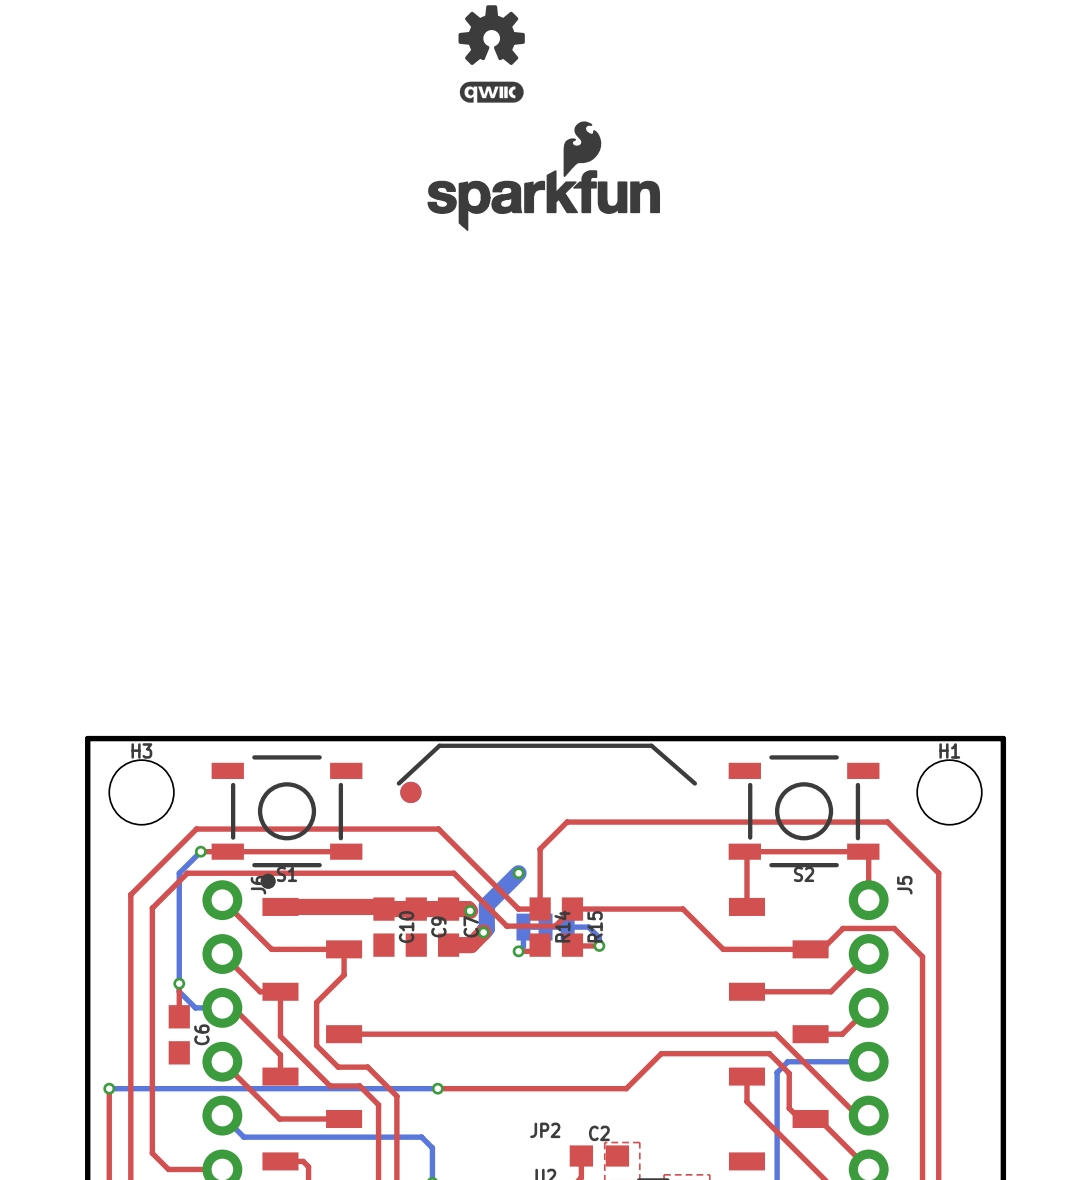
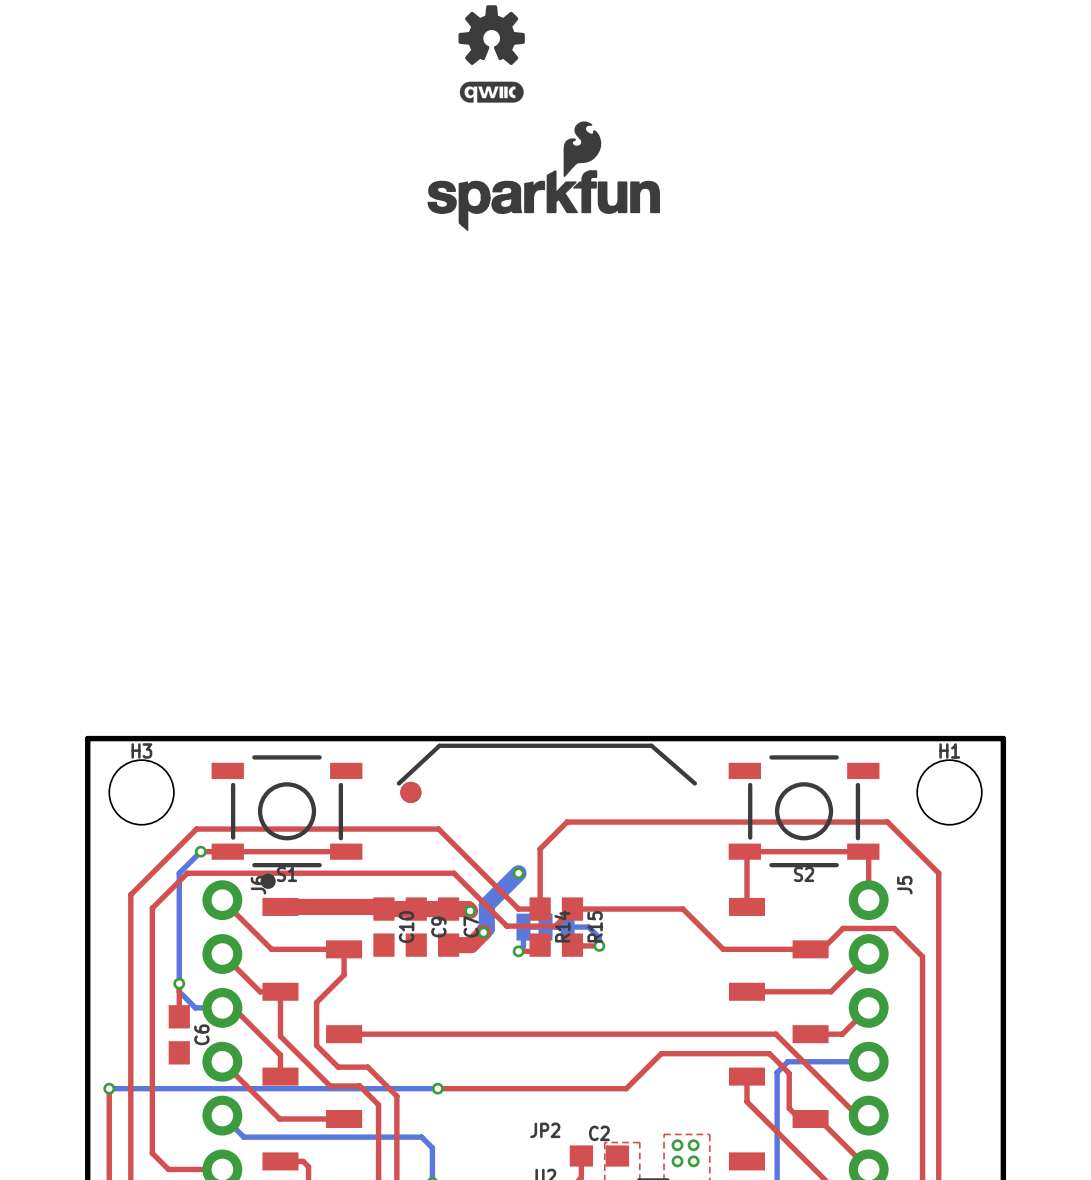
via: none -> (677, 1145)
via: none -> (693, 1145)
via: none -> (677, 1161)
via: none -> (693, 1161)
top zone outline: (664, 1174) (709, 1174) -> (664, 1174) (664, 1134) (709, 1134) (709, 1174)

